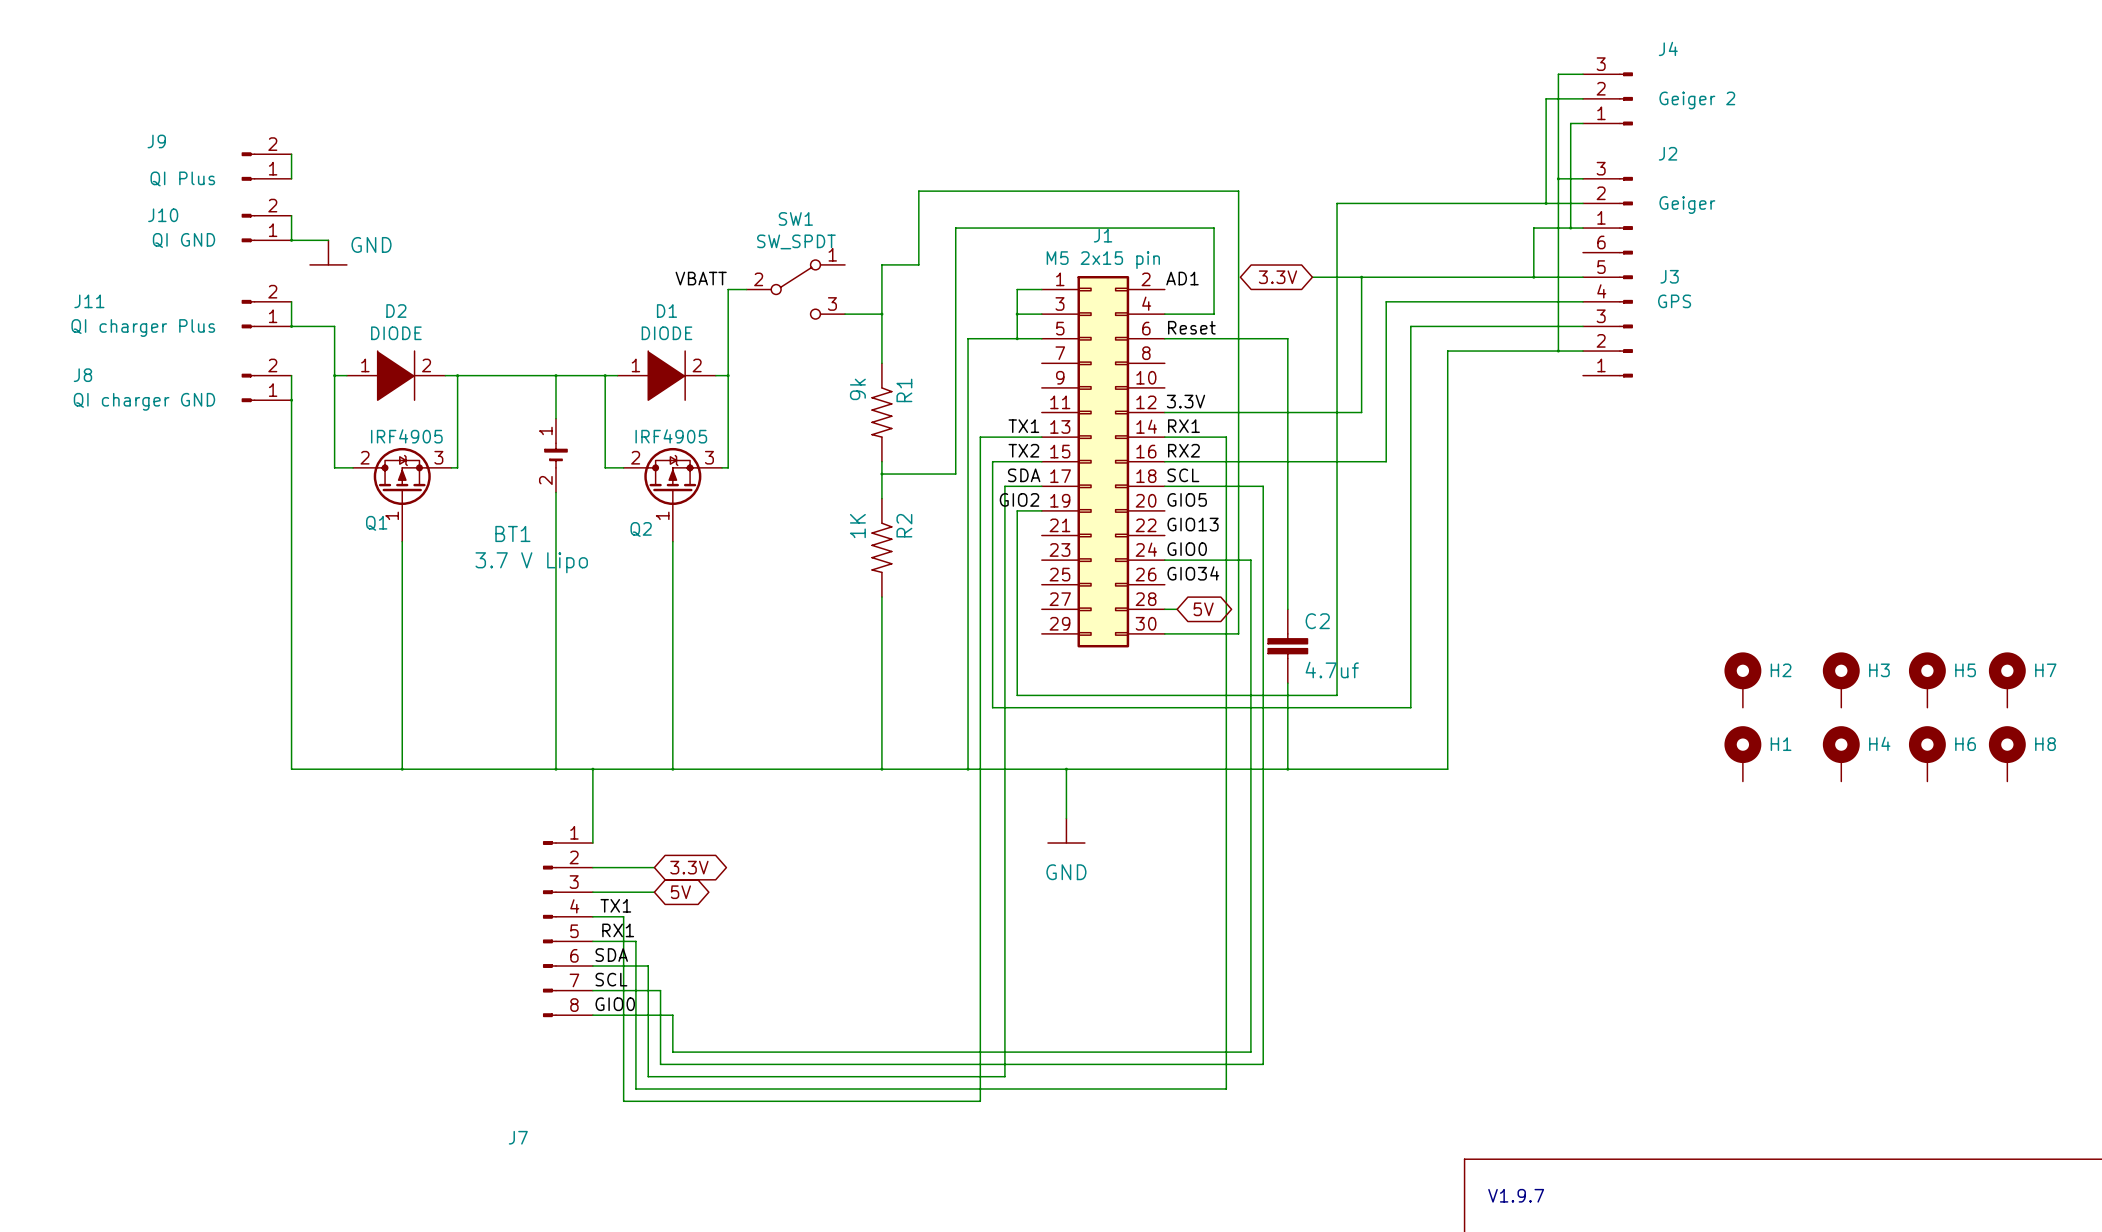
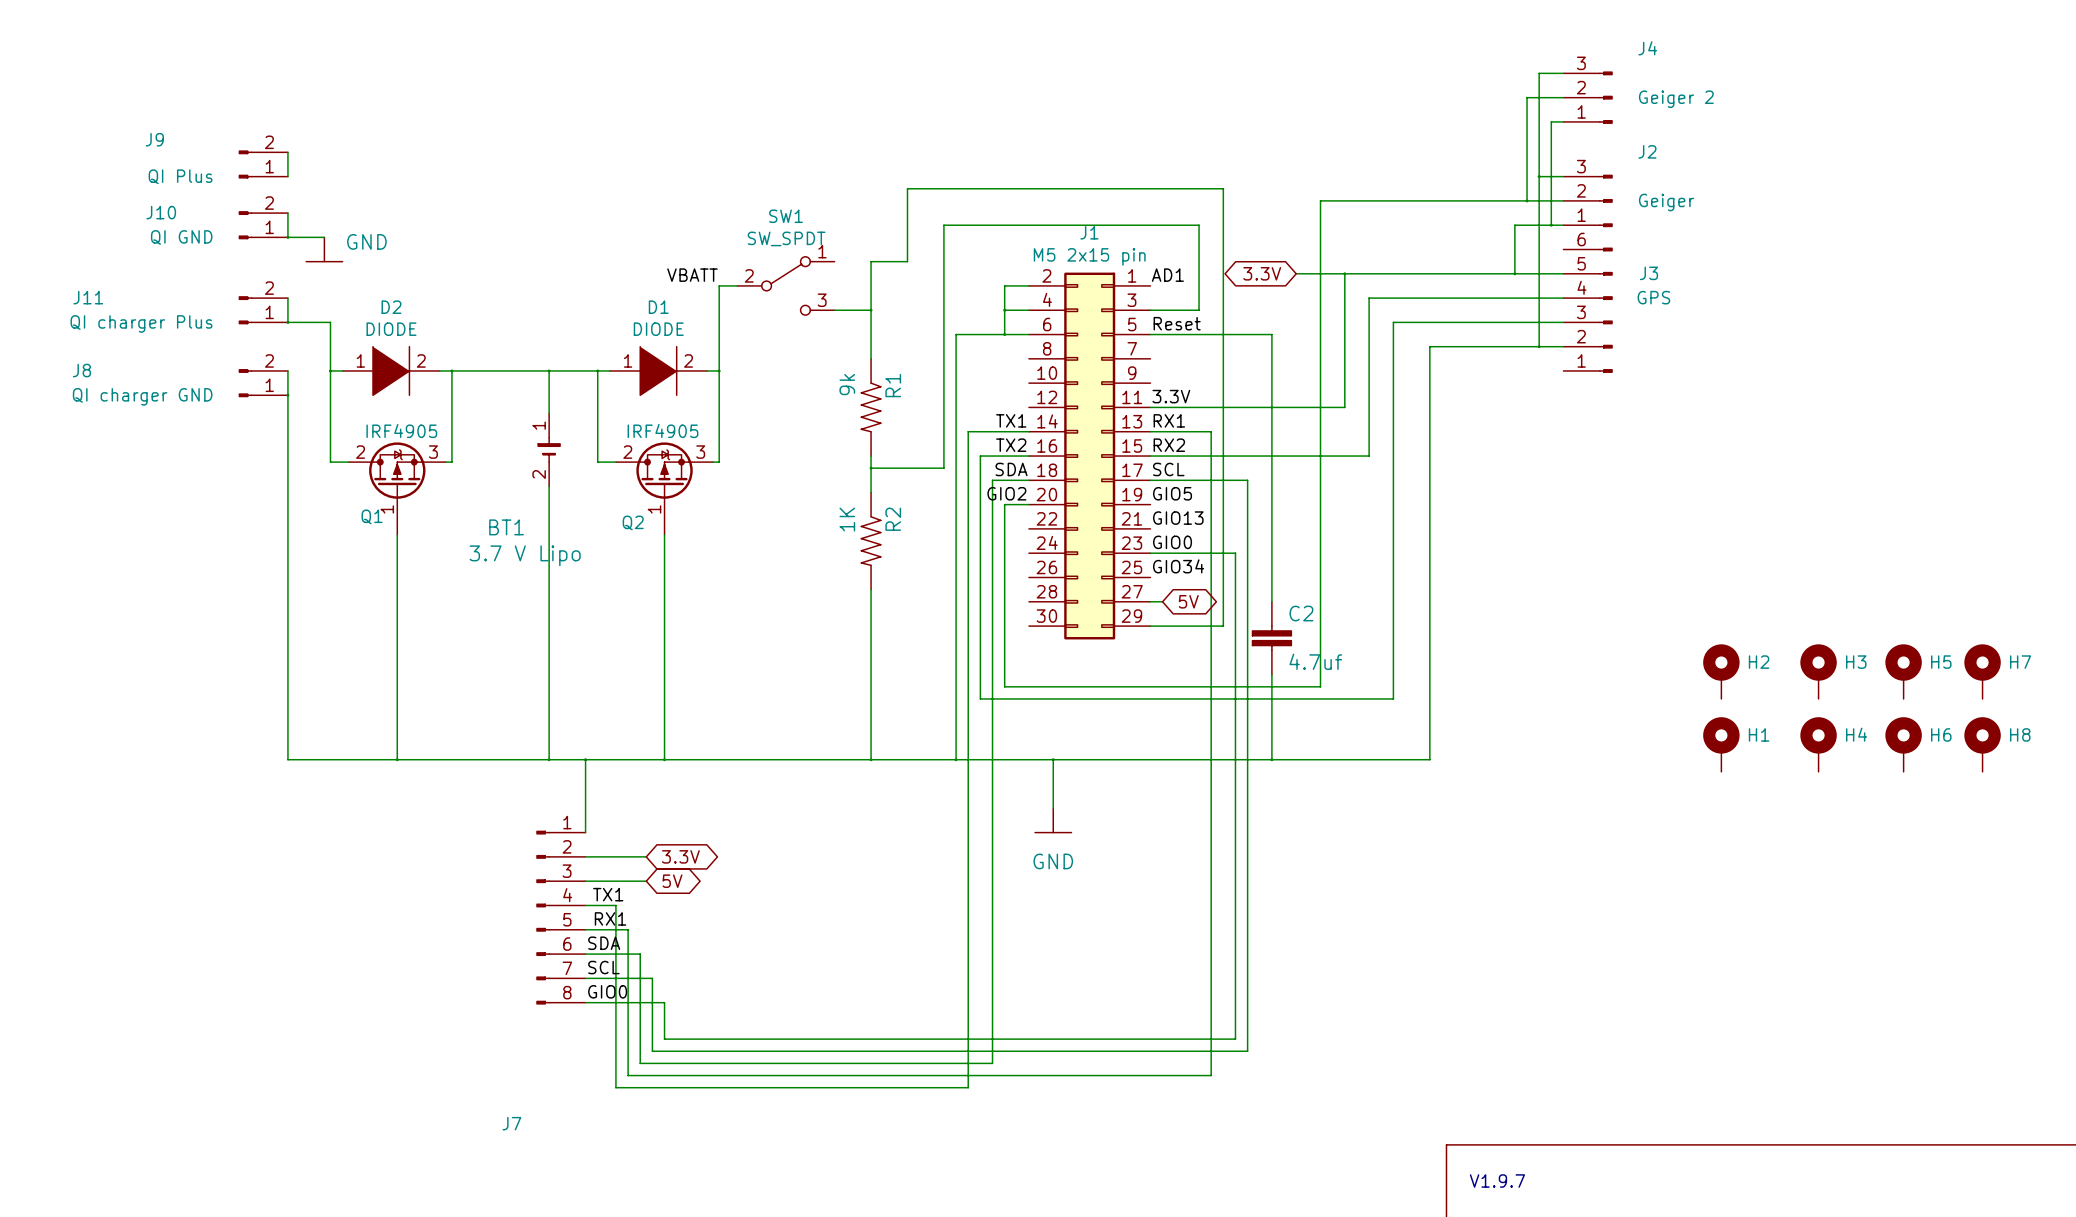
J1 flip: as is (1103, 461) -> left-right (1089, 456)

